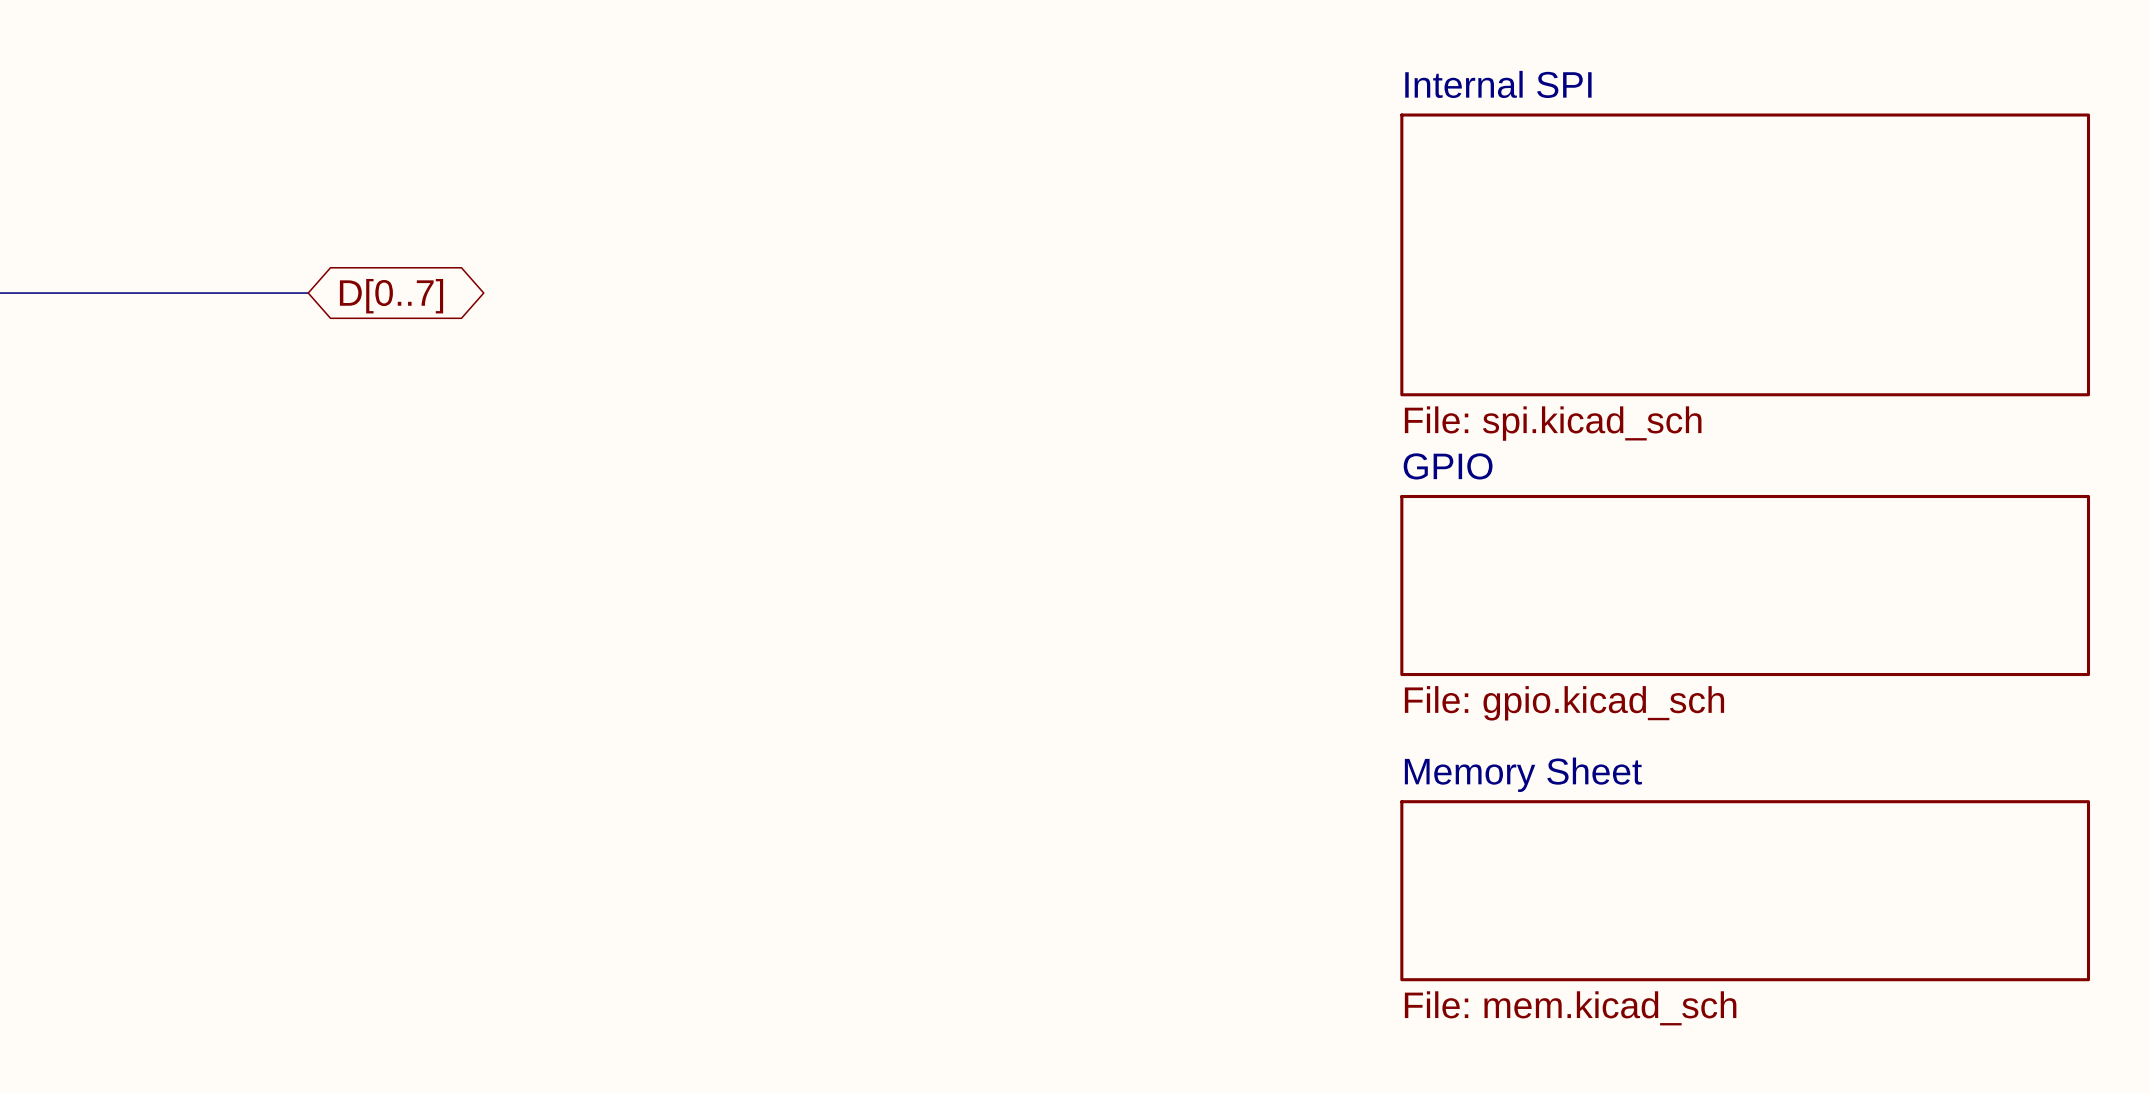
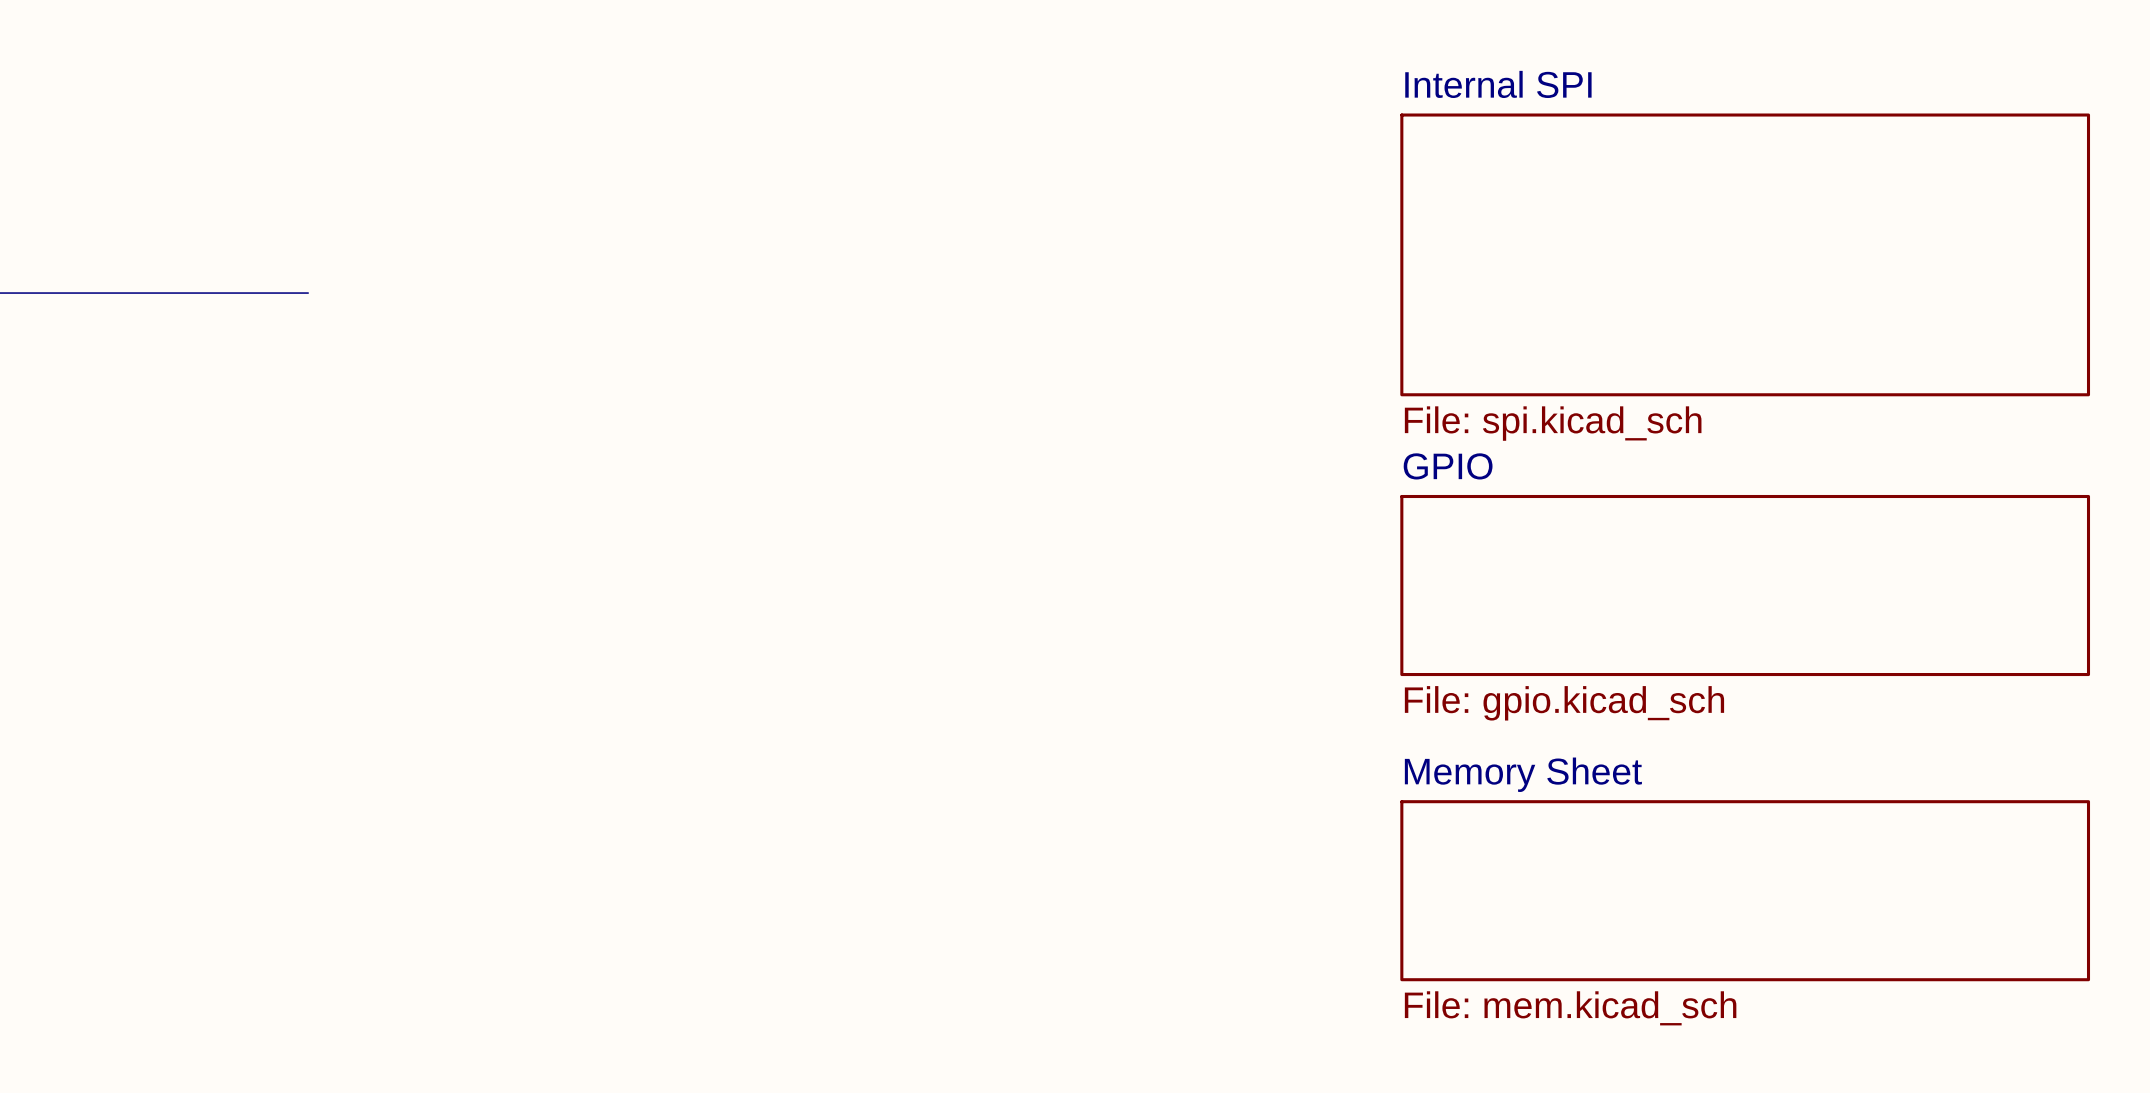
global label: D[0..7] (391, 296) -> none

